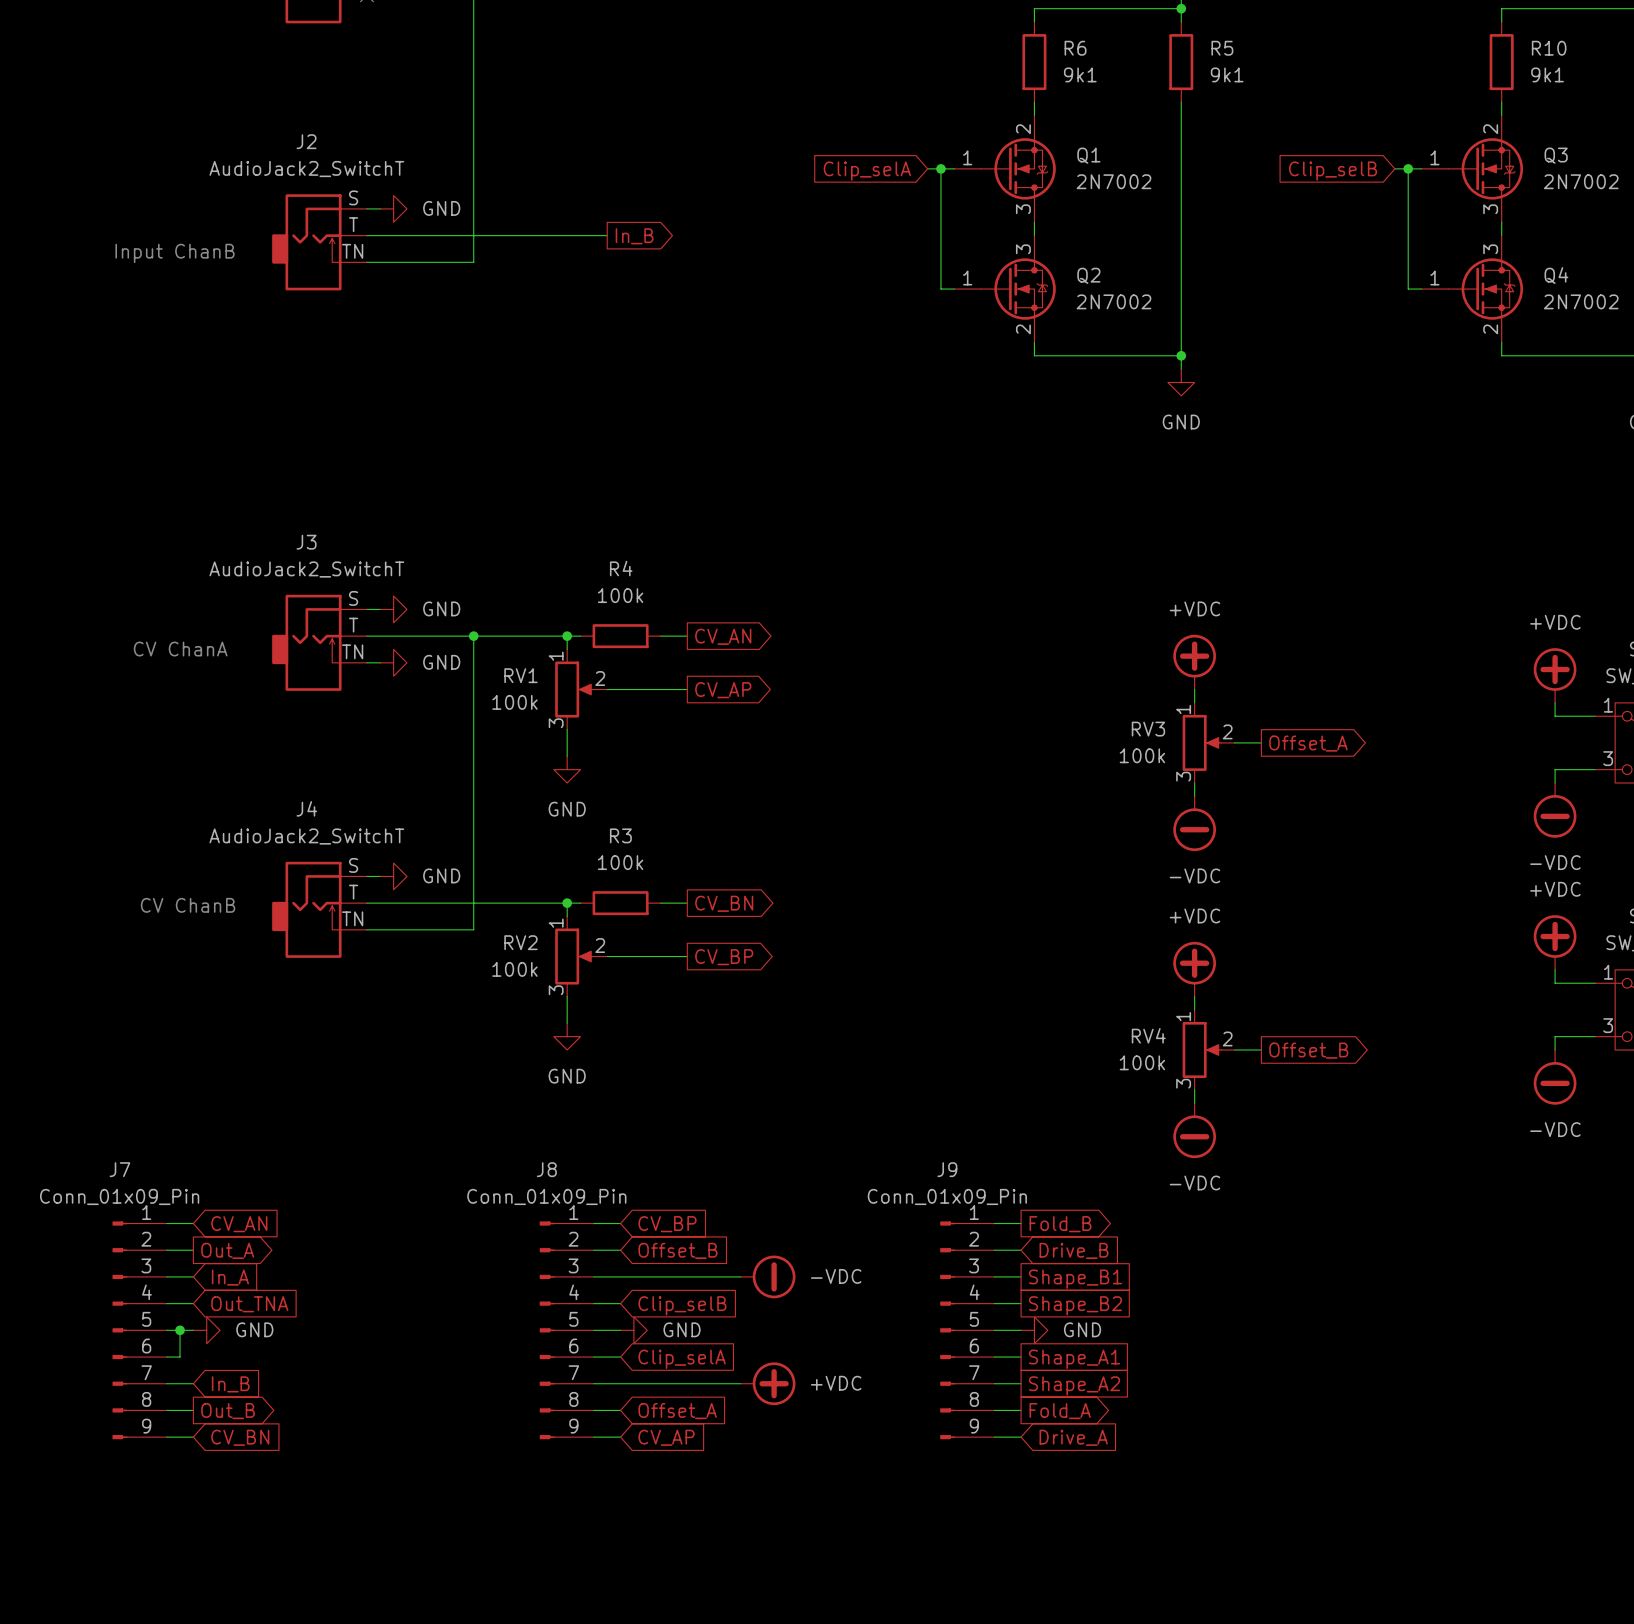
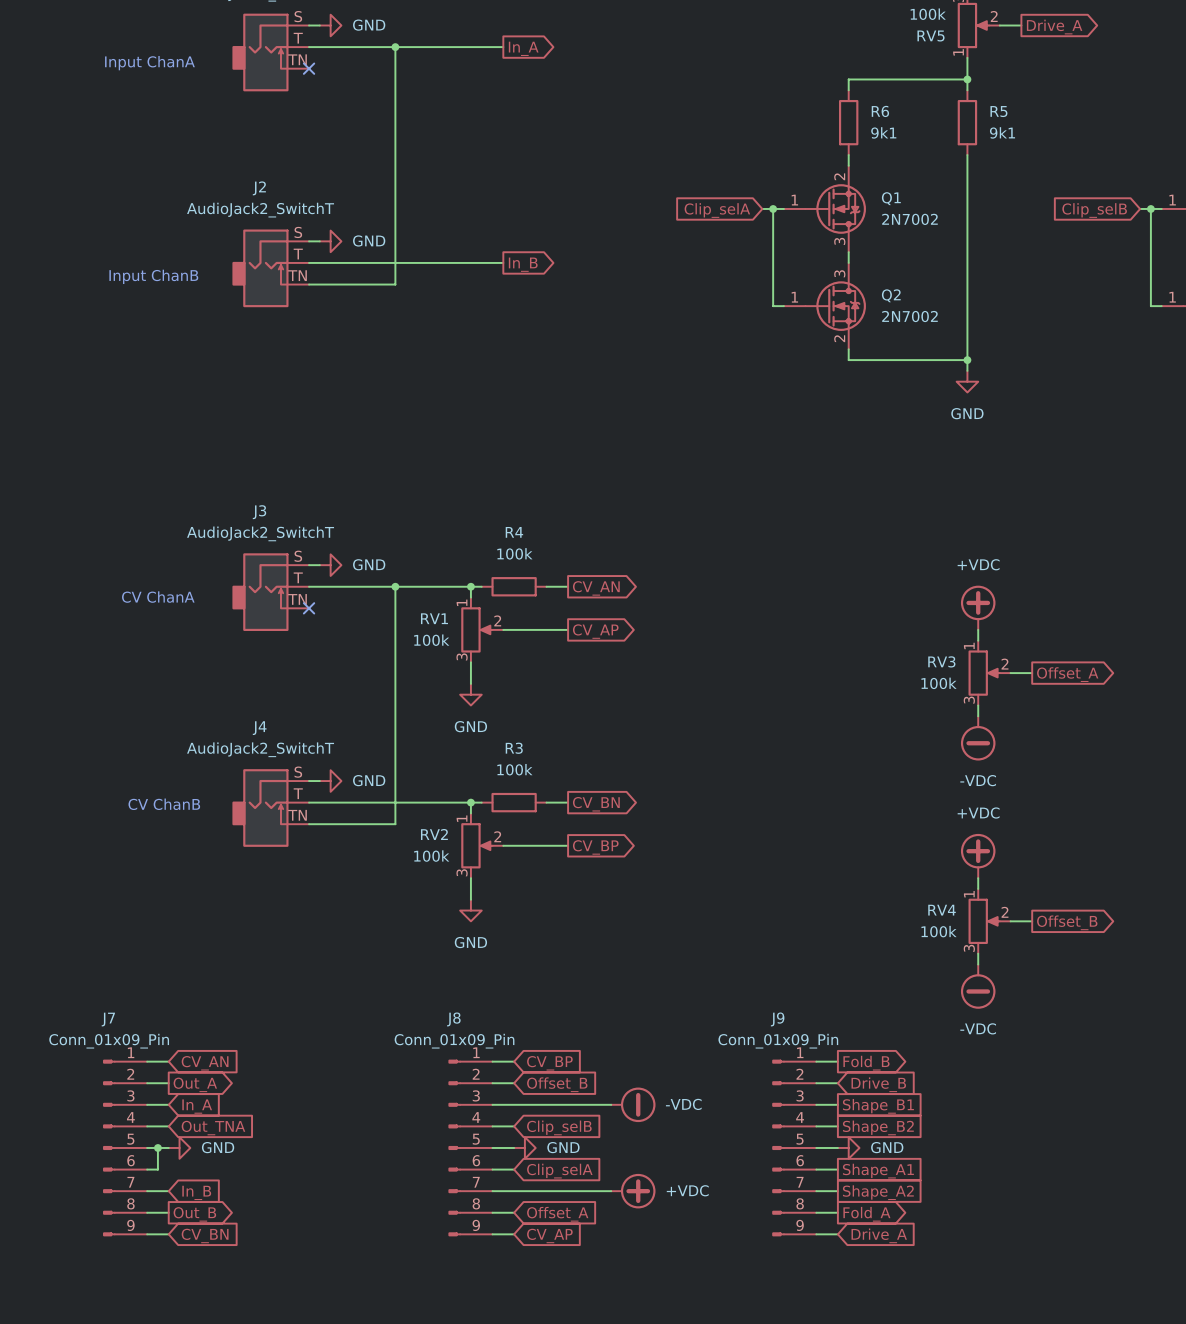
wire: (366, 662) (380, 662) -> none
no-connect mark: none -> (309, 608)
power symbol: GND (393, 662) -> none

